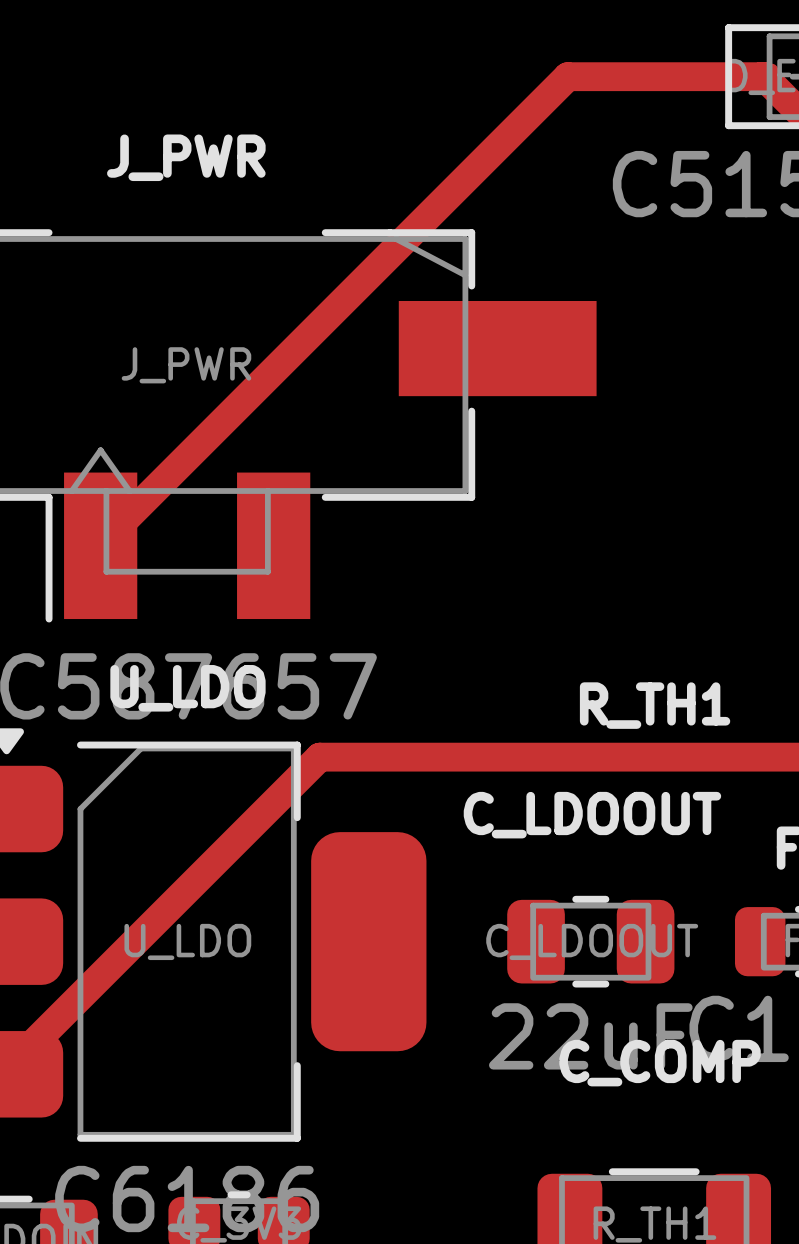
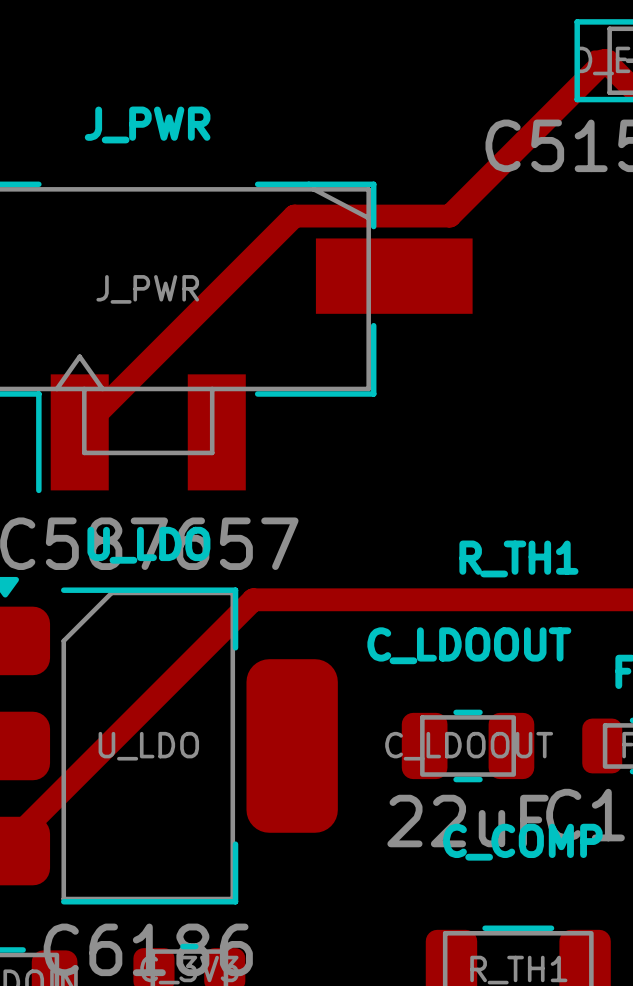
top track: (760, 76) (567, 76) (371, 272) -> (605, 60) (449, 216) (294, 216)

